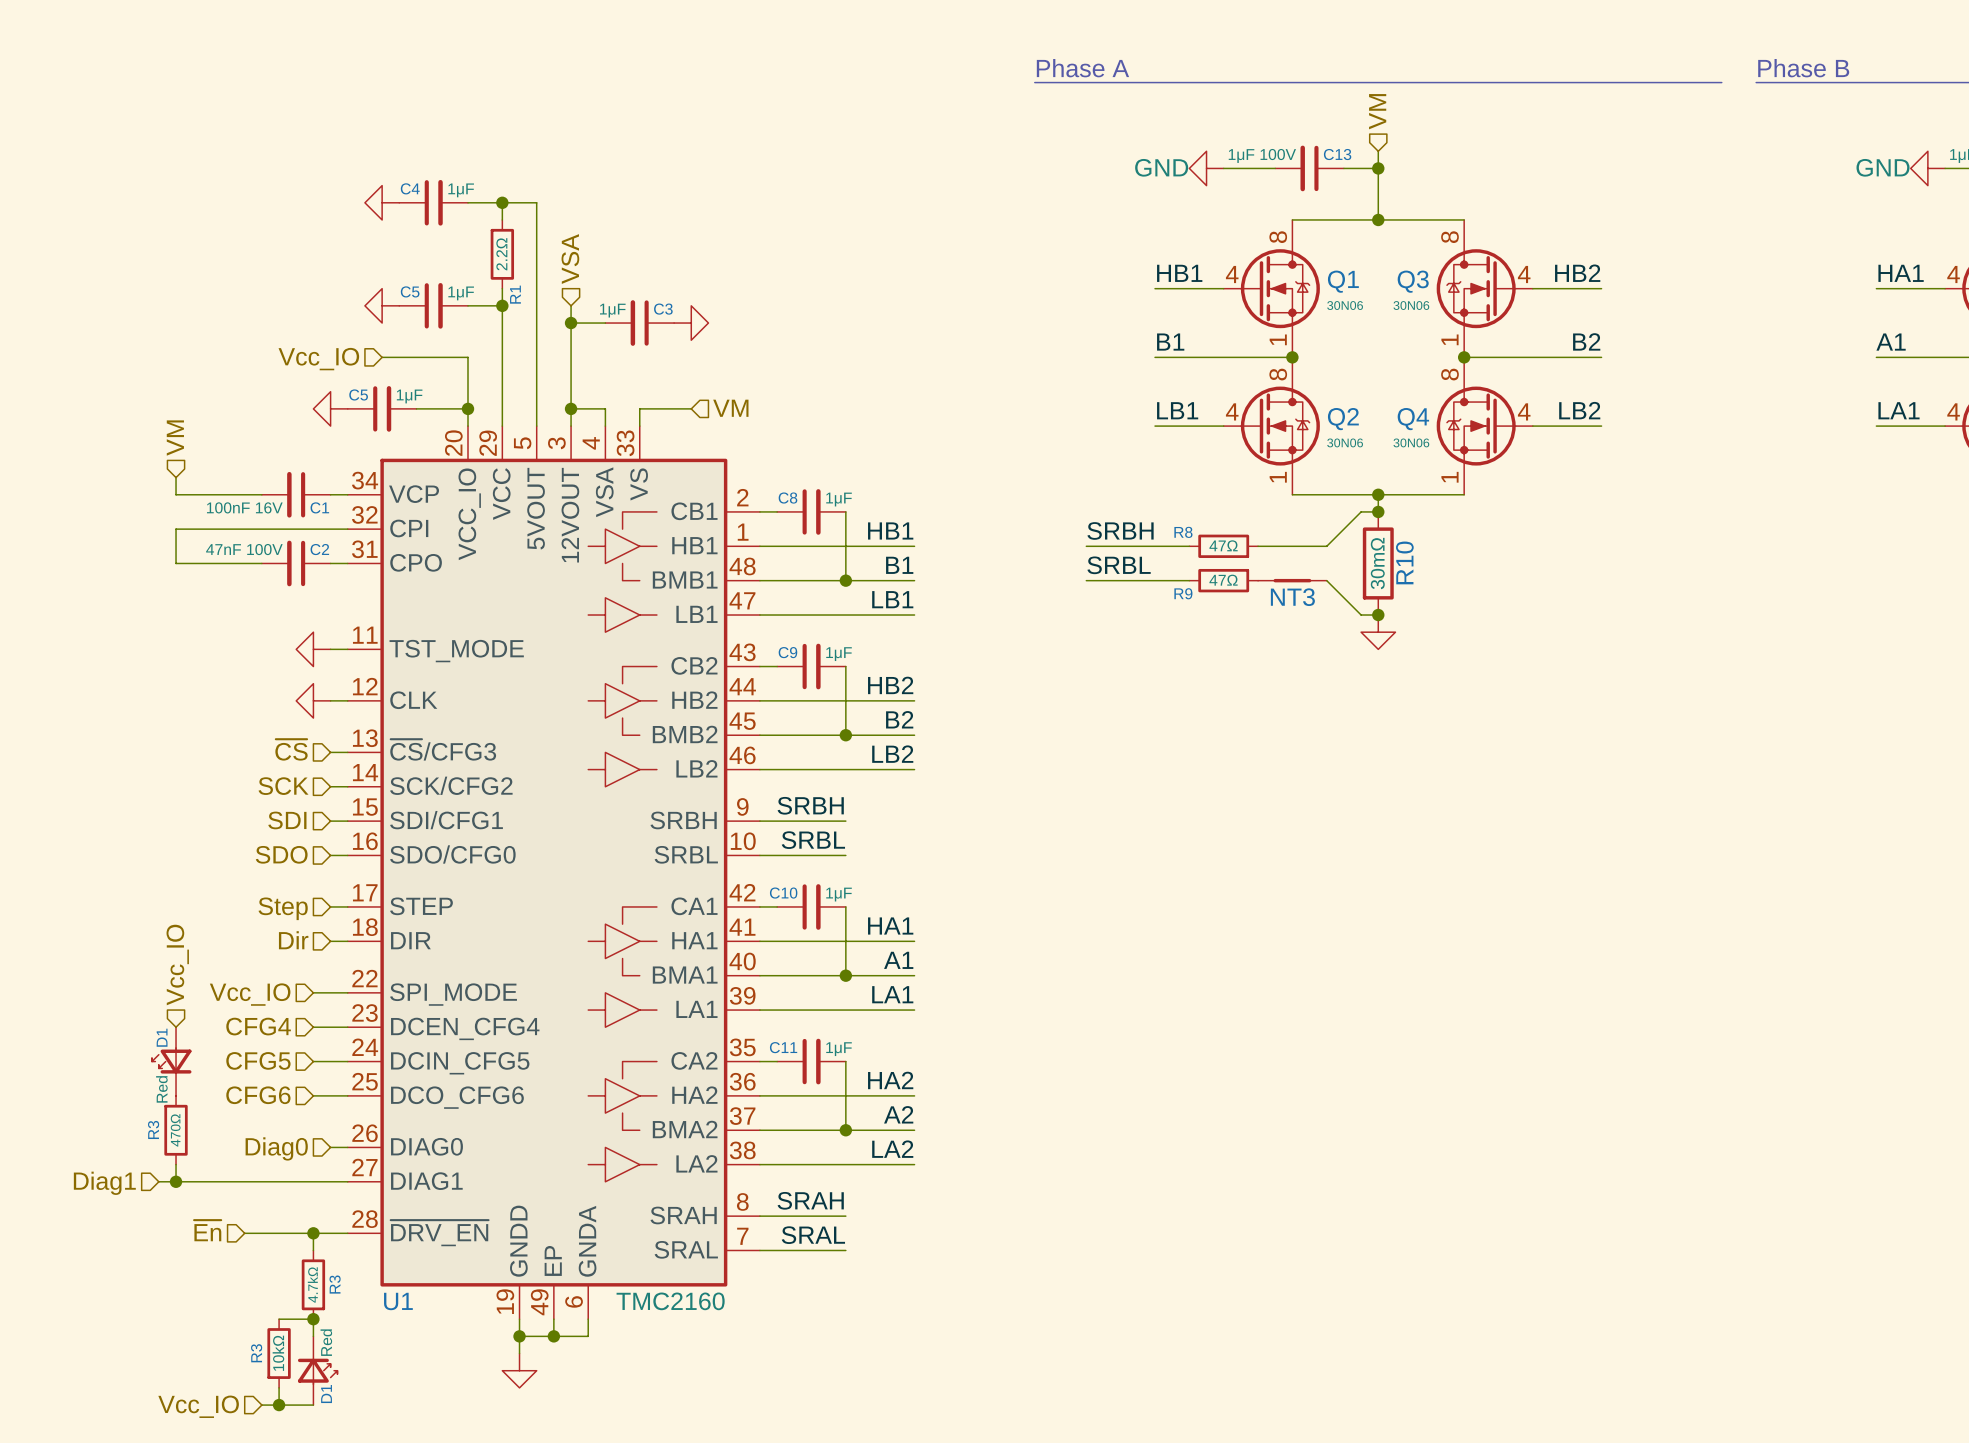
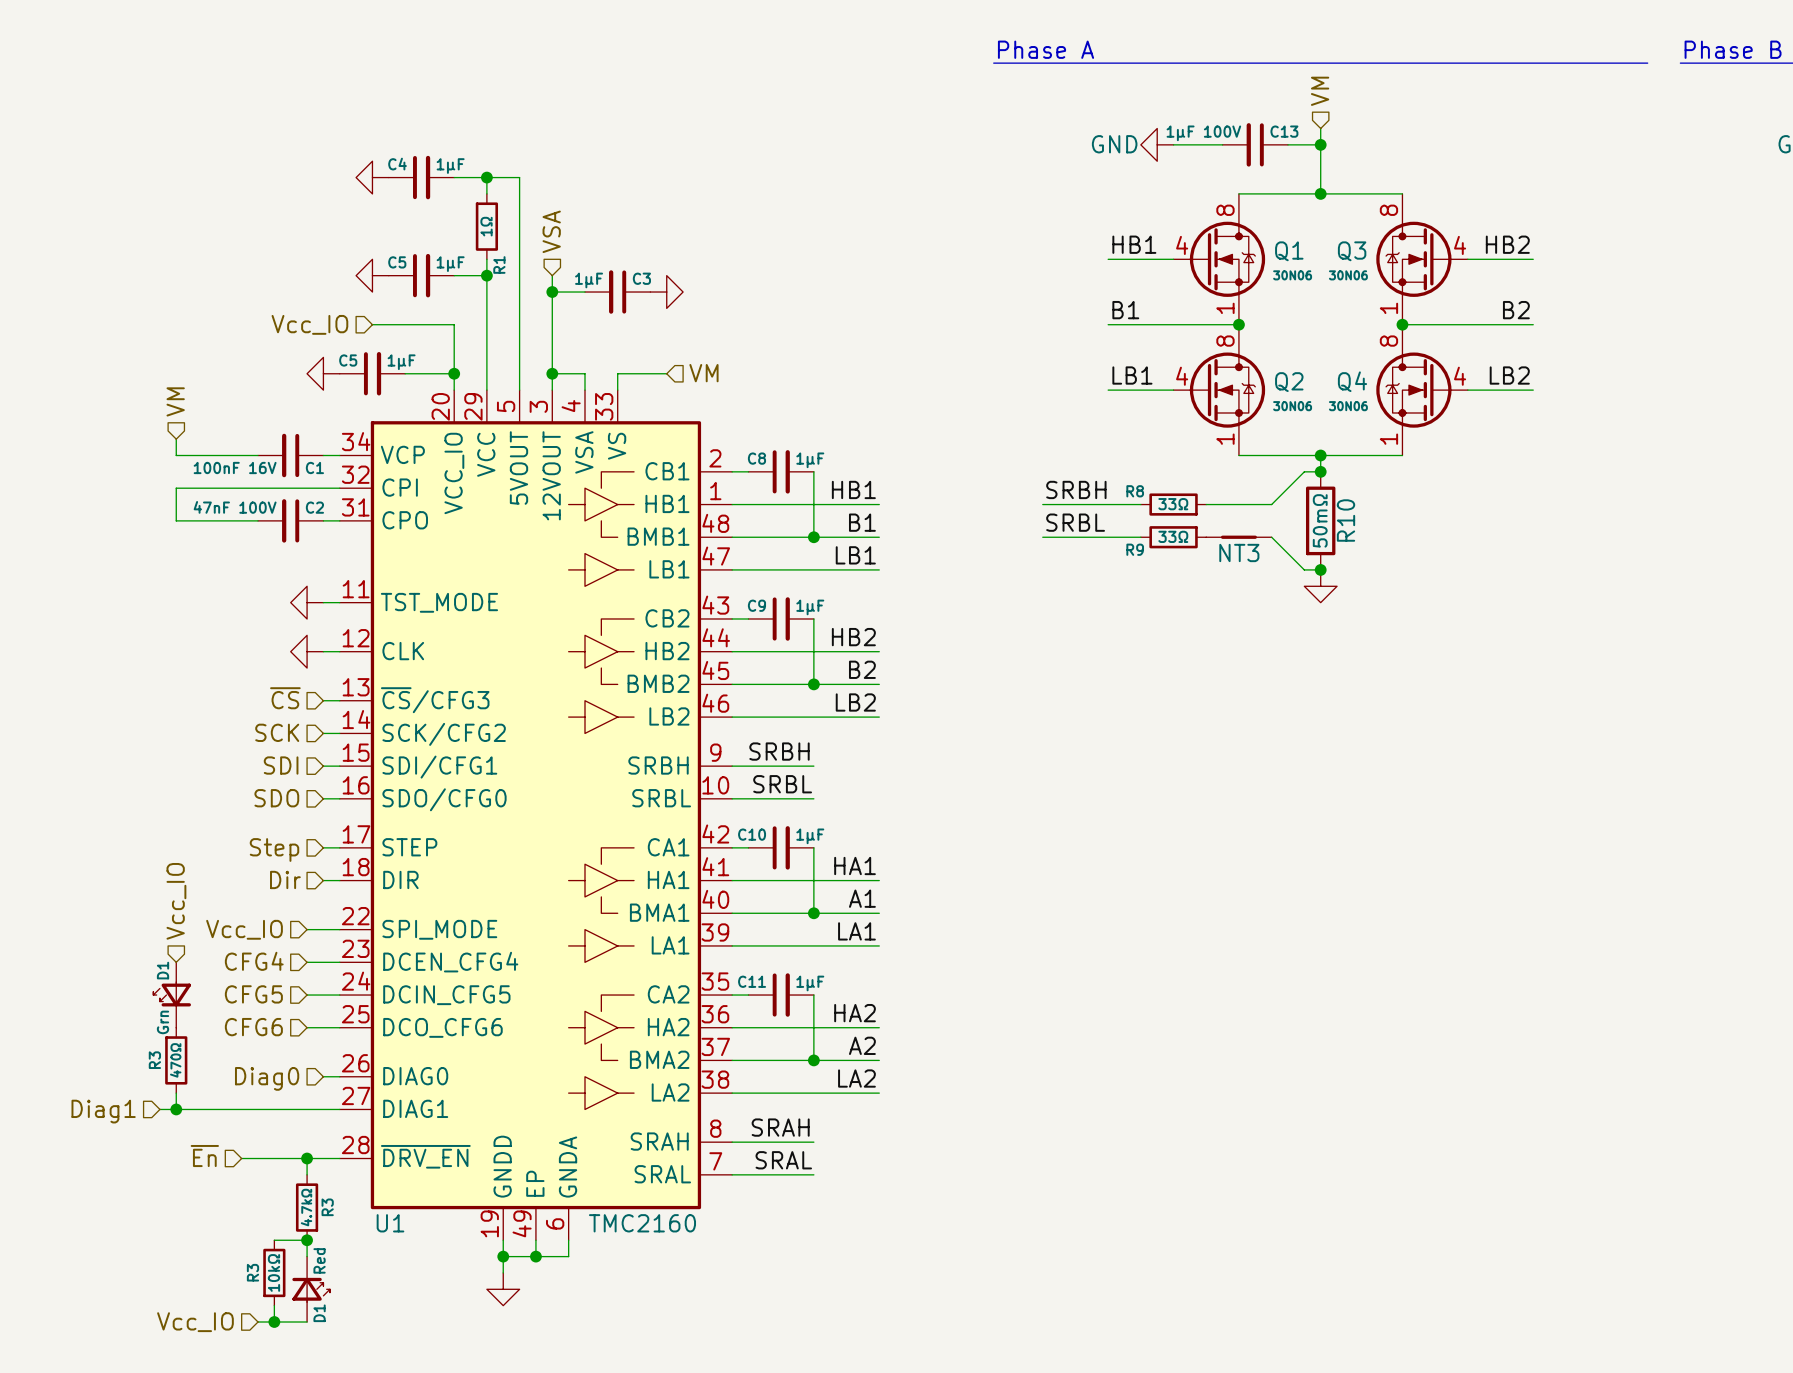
R1 value: 2.2Ω (501, 254) -> 1Ω (486, 226)
R8 value: 47Ω (1223, 545) -> 33Ω (1173, 504)
R10 value: 30mΩ (1377, 563) -> 50mΩ (1320, 520)
R9 value: 47Ω (1223, 580) -> 33Ω (1173, 536)
D1 value: Red (161, 1089) -> Grn (163, 1022)

